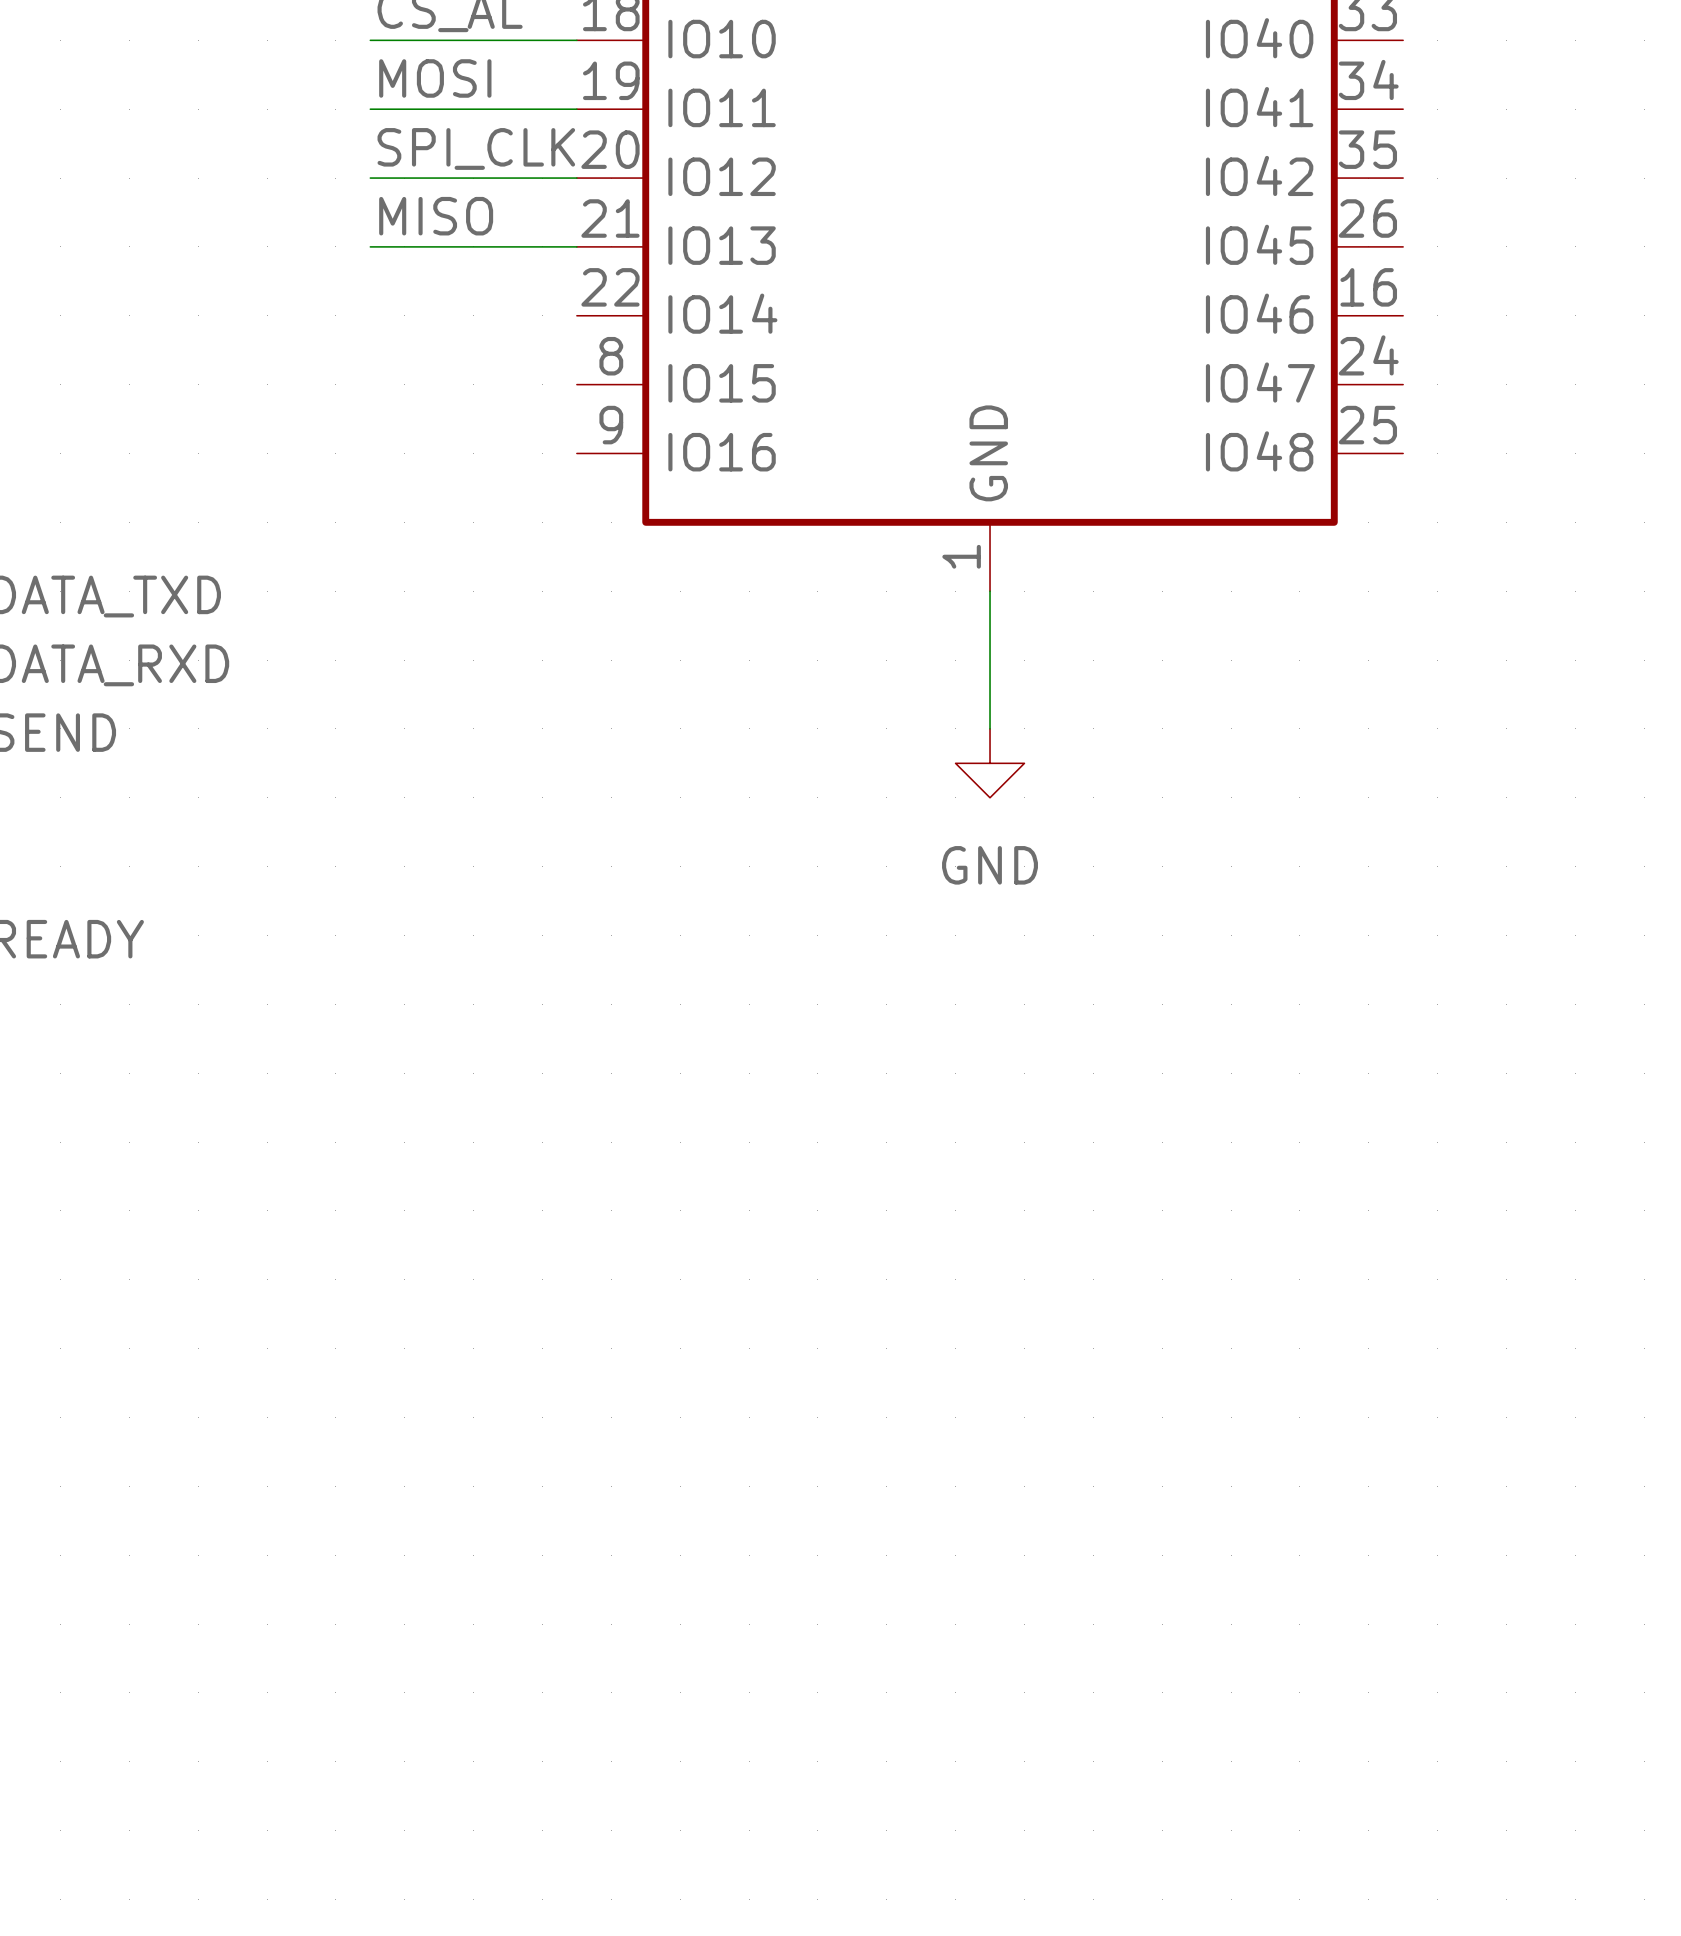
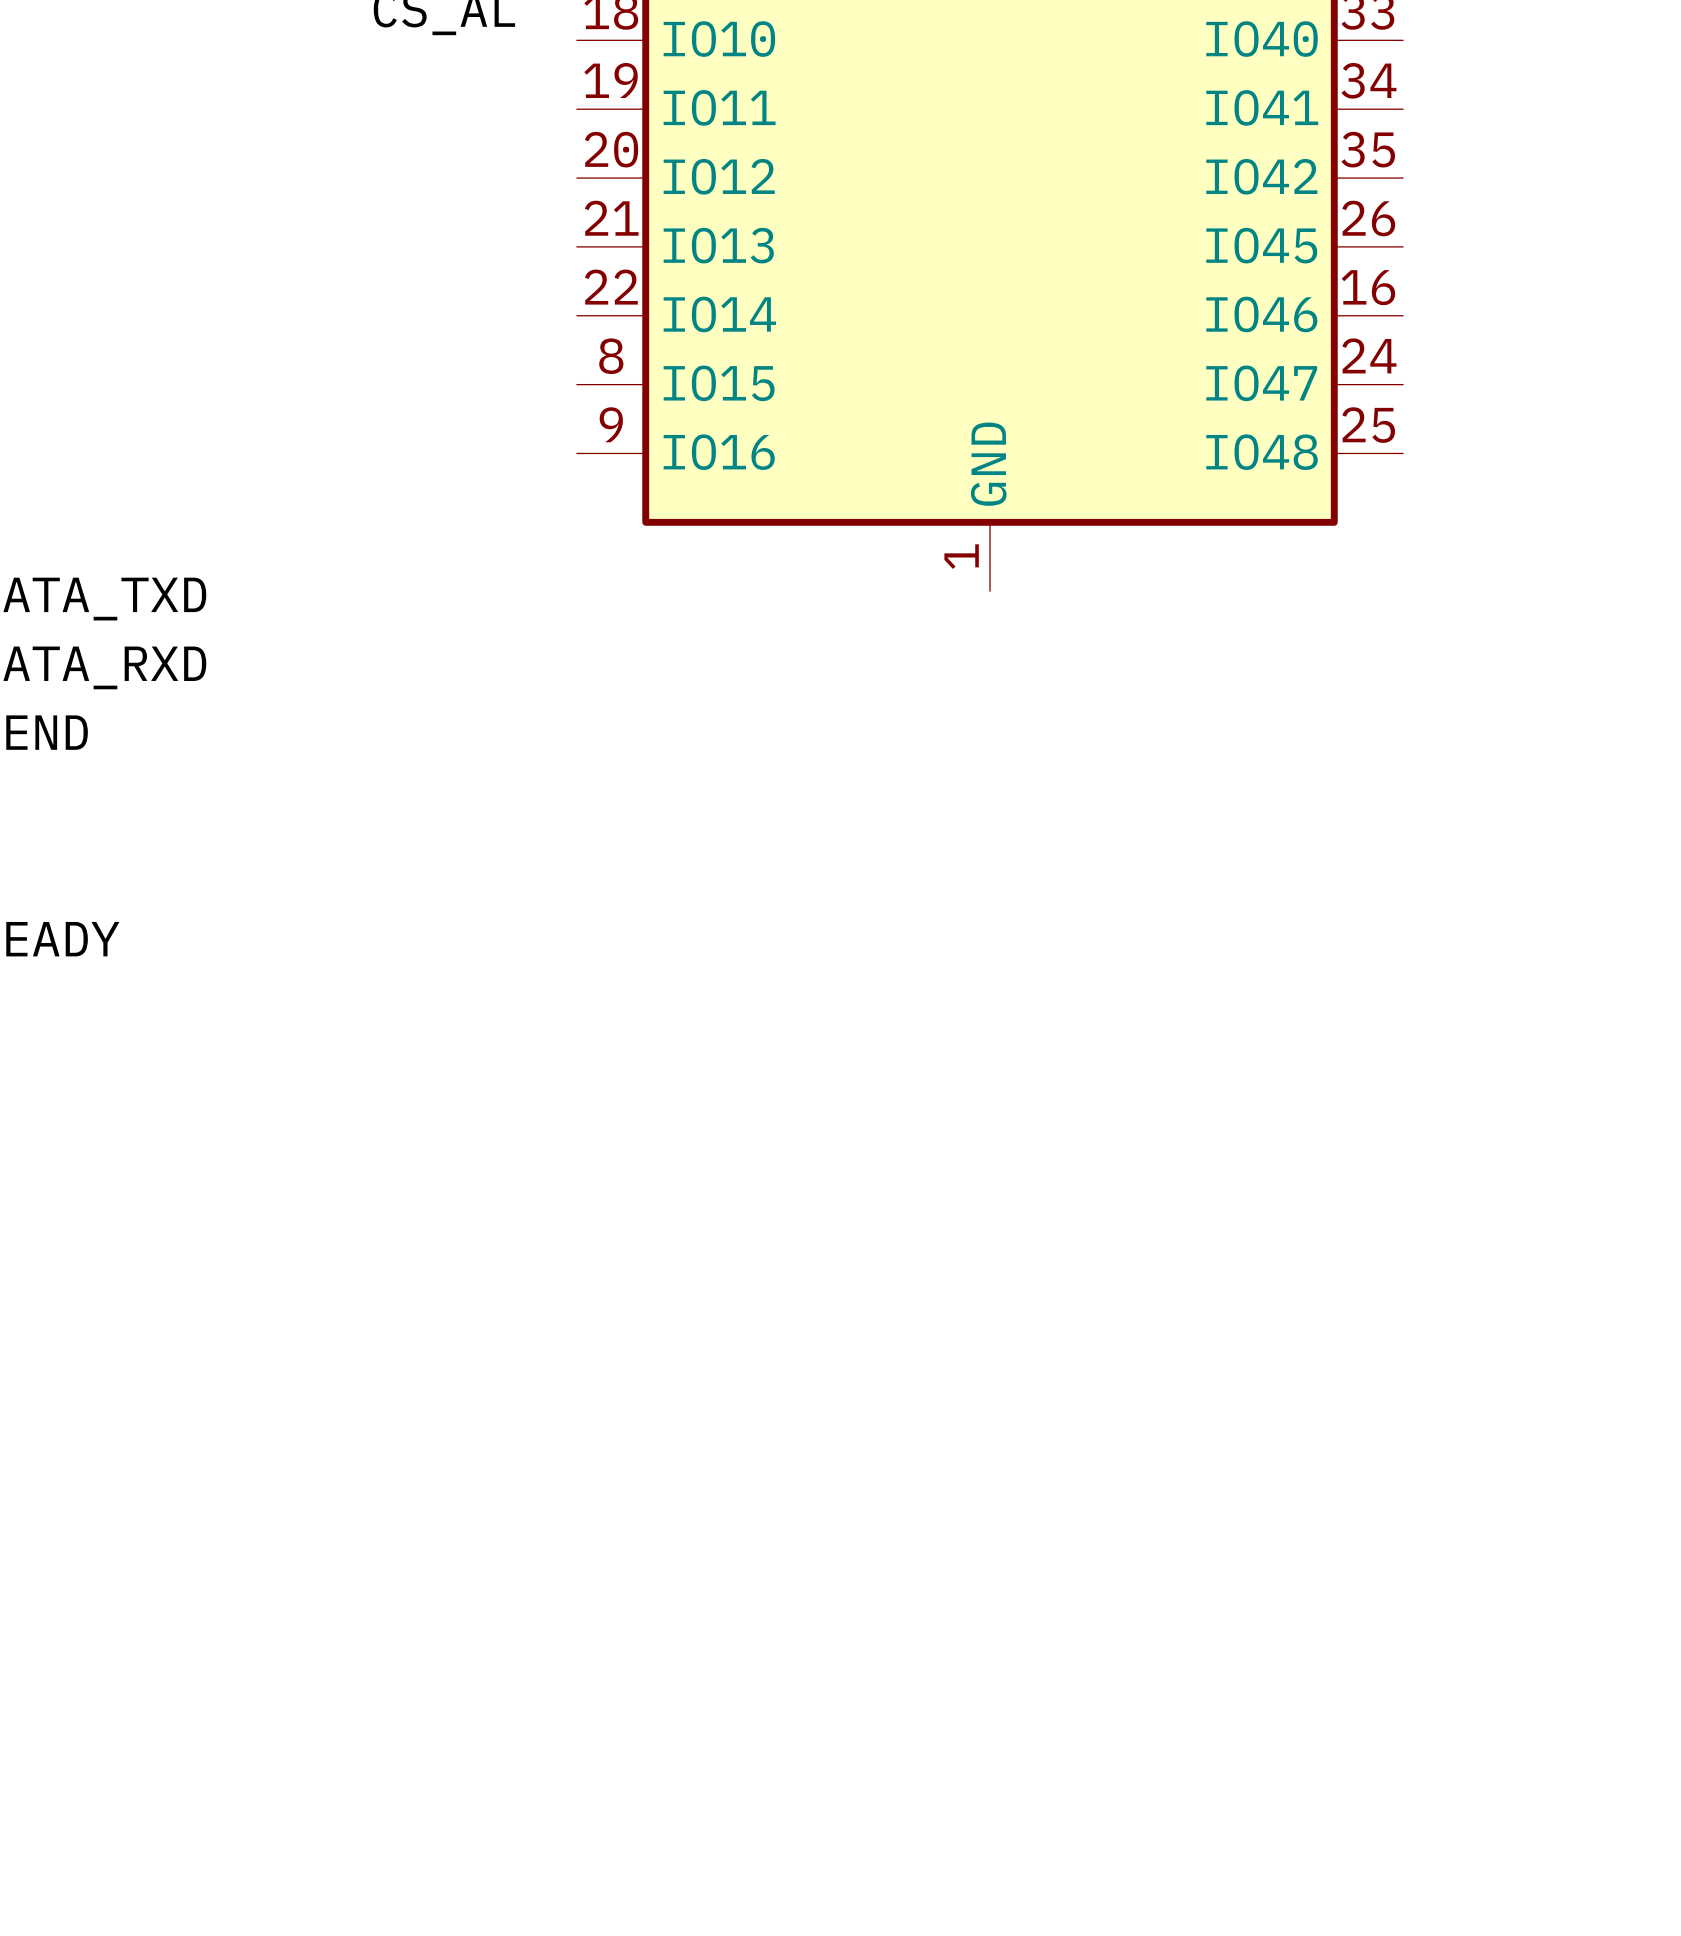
wire: (370, 40) (576, 40) -> none
label: MOSI (435, 78) -> none
wire: (370, 109) (576, 109) -> none
label: SPI_CLK (476, 148) -> none
wire: (370, 178) (576, 178) -> none
label: MISO (436, 216) -> none
wire: (370, 246) (576, 246) -> none
wire: (990, 591) (990, 728) -> none
power symbol: GND (990, 763) -> none

